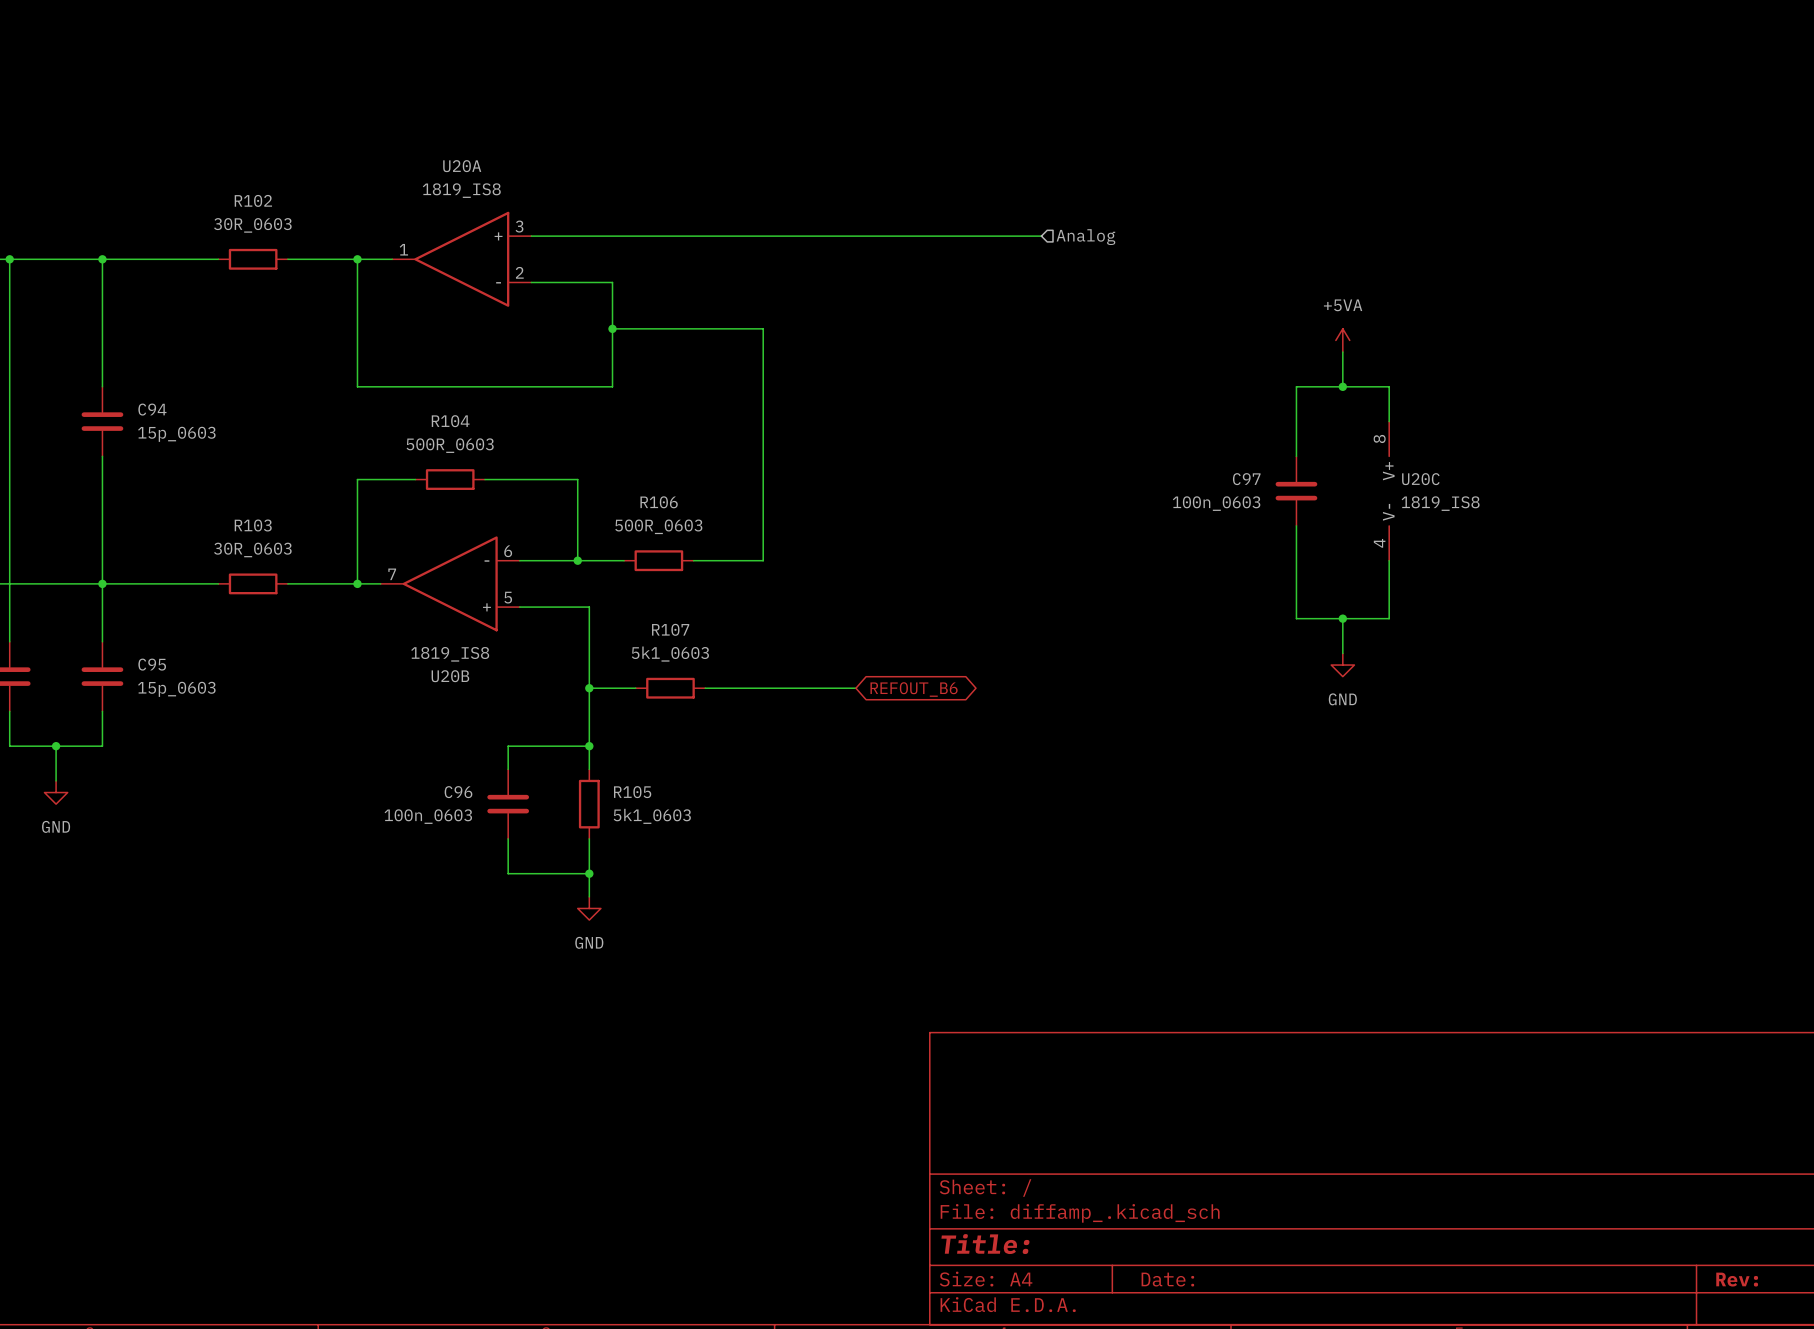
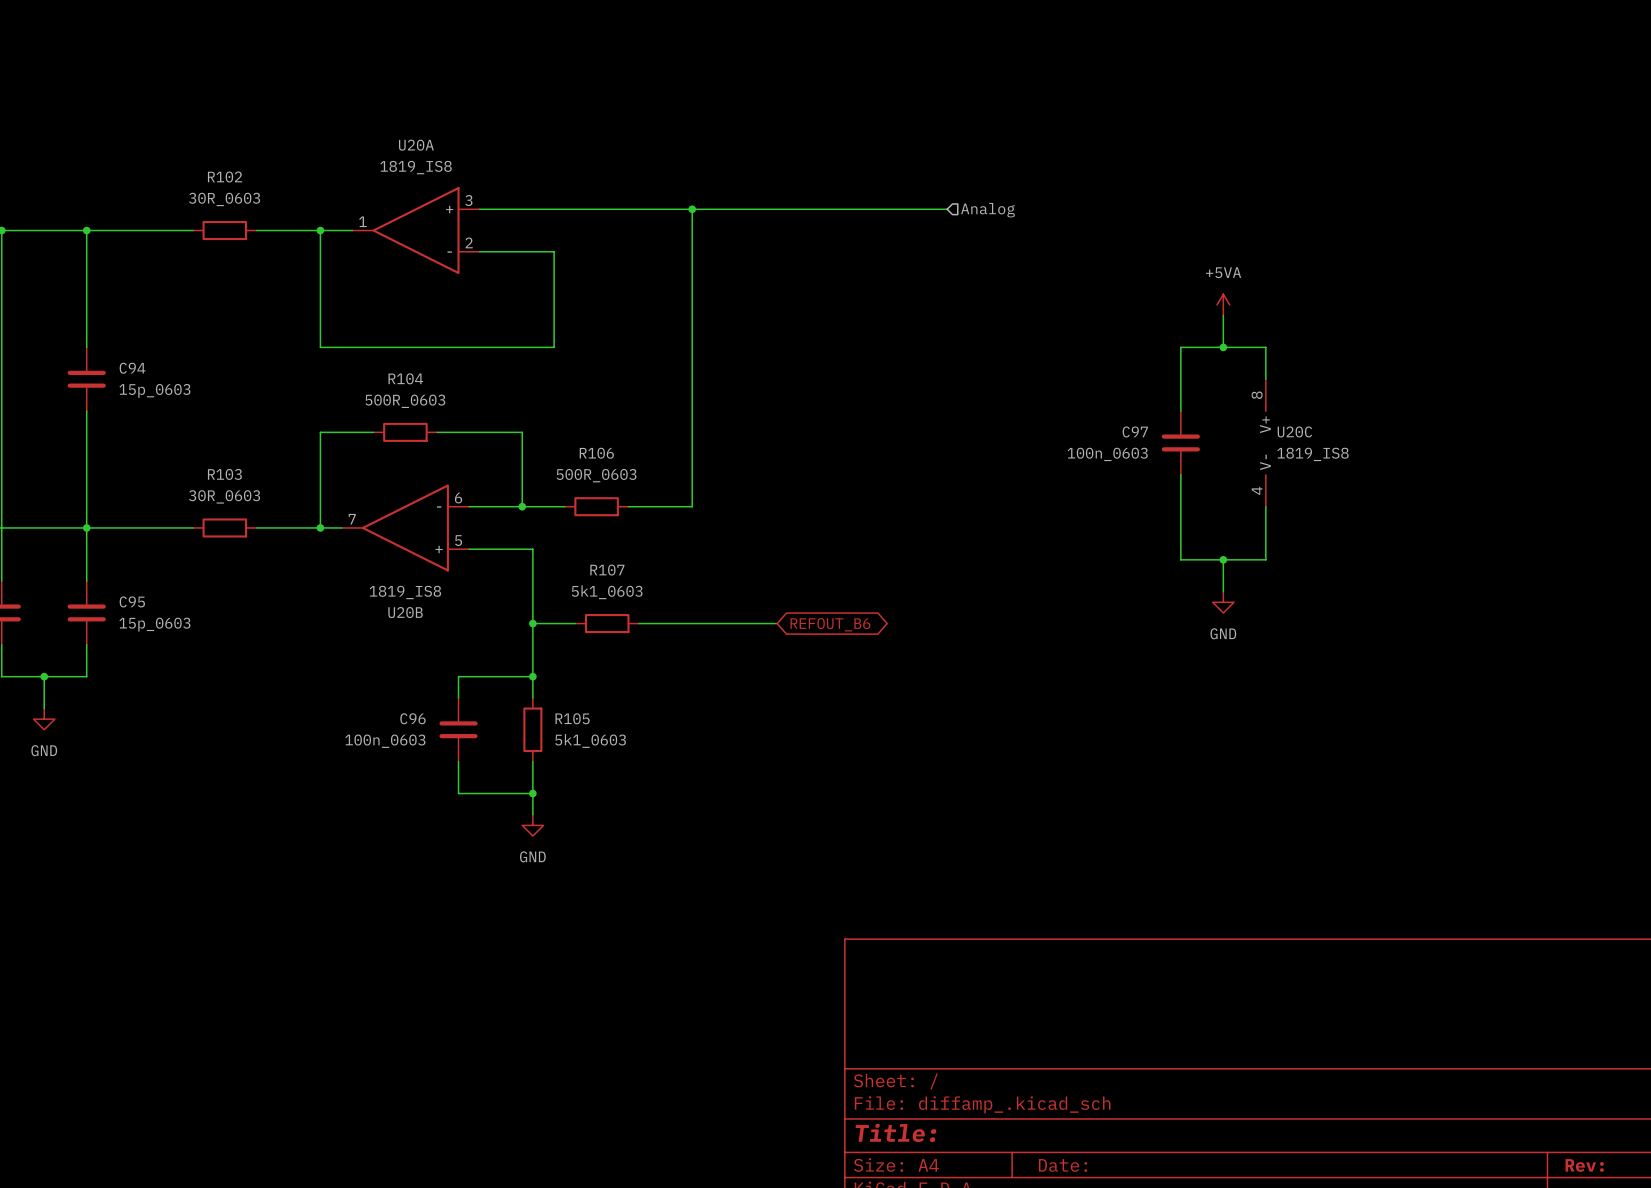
junction: none -> (692, 209)
wire: (612, 328) (763, 328) -> (692, 209) (692, 294)
junction: (612, 328) -> none

